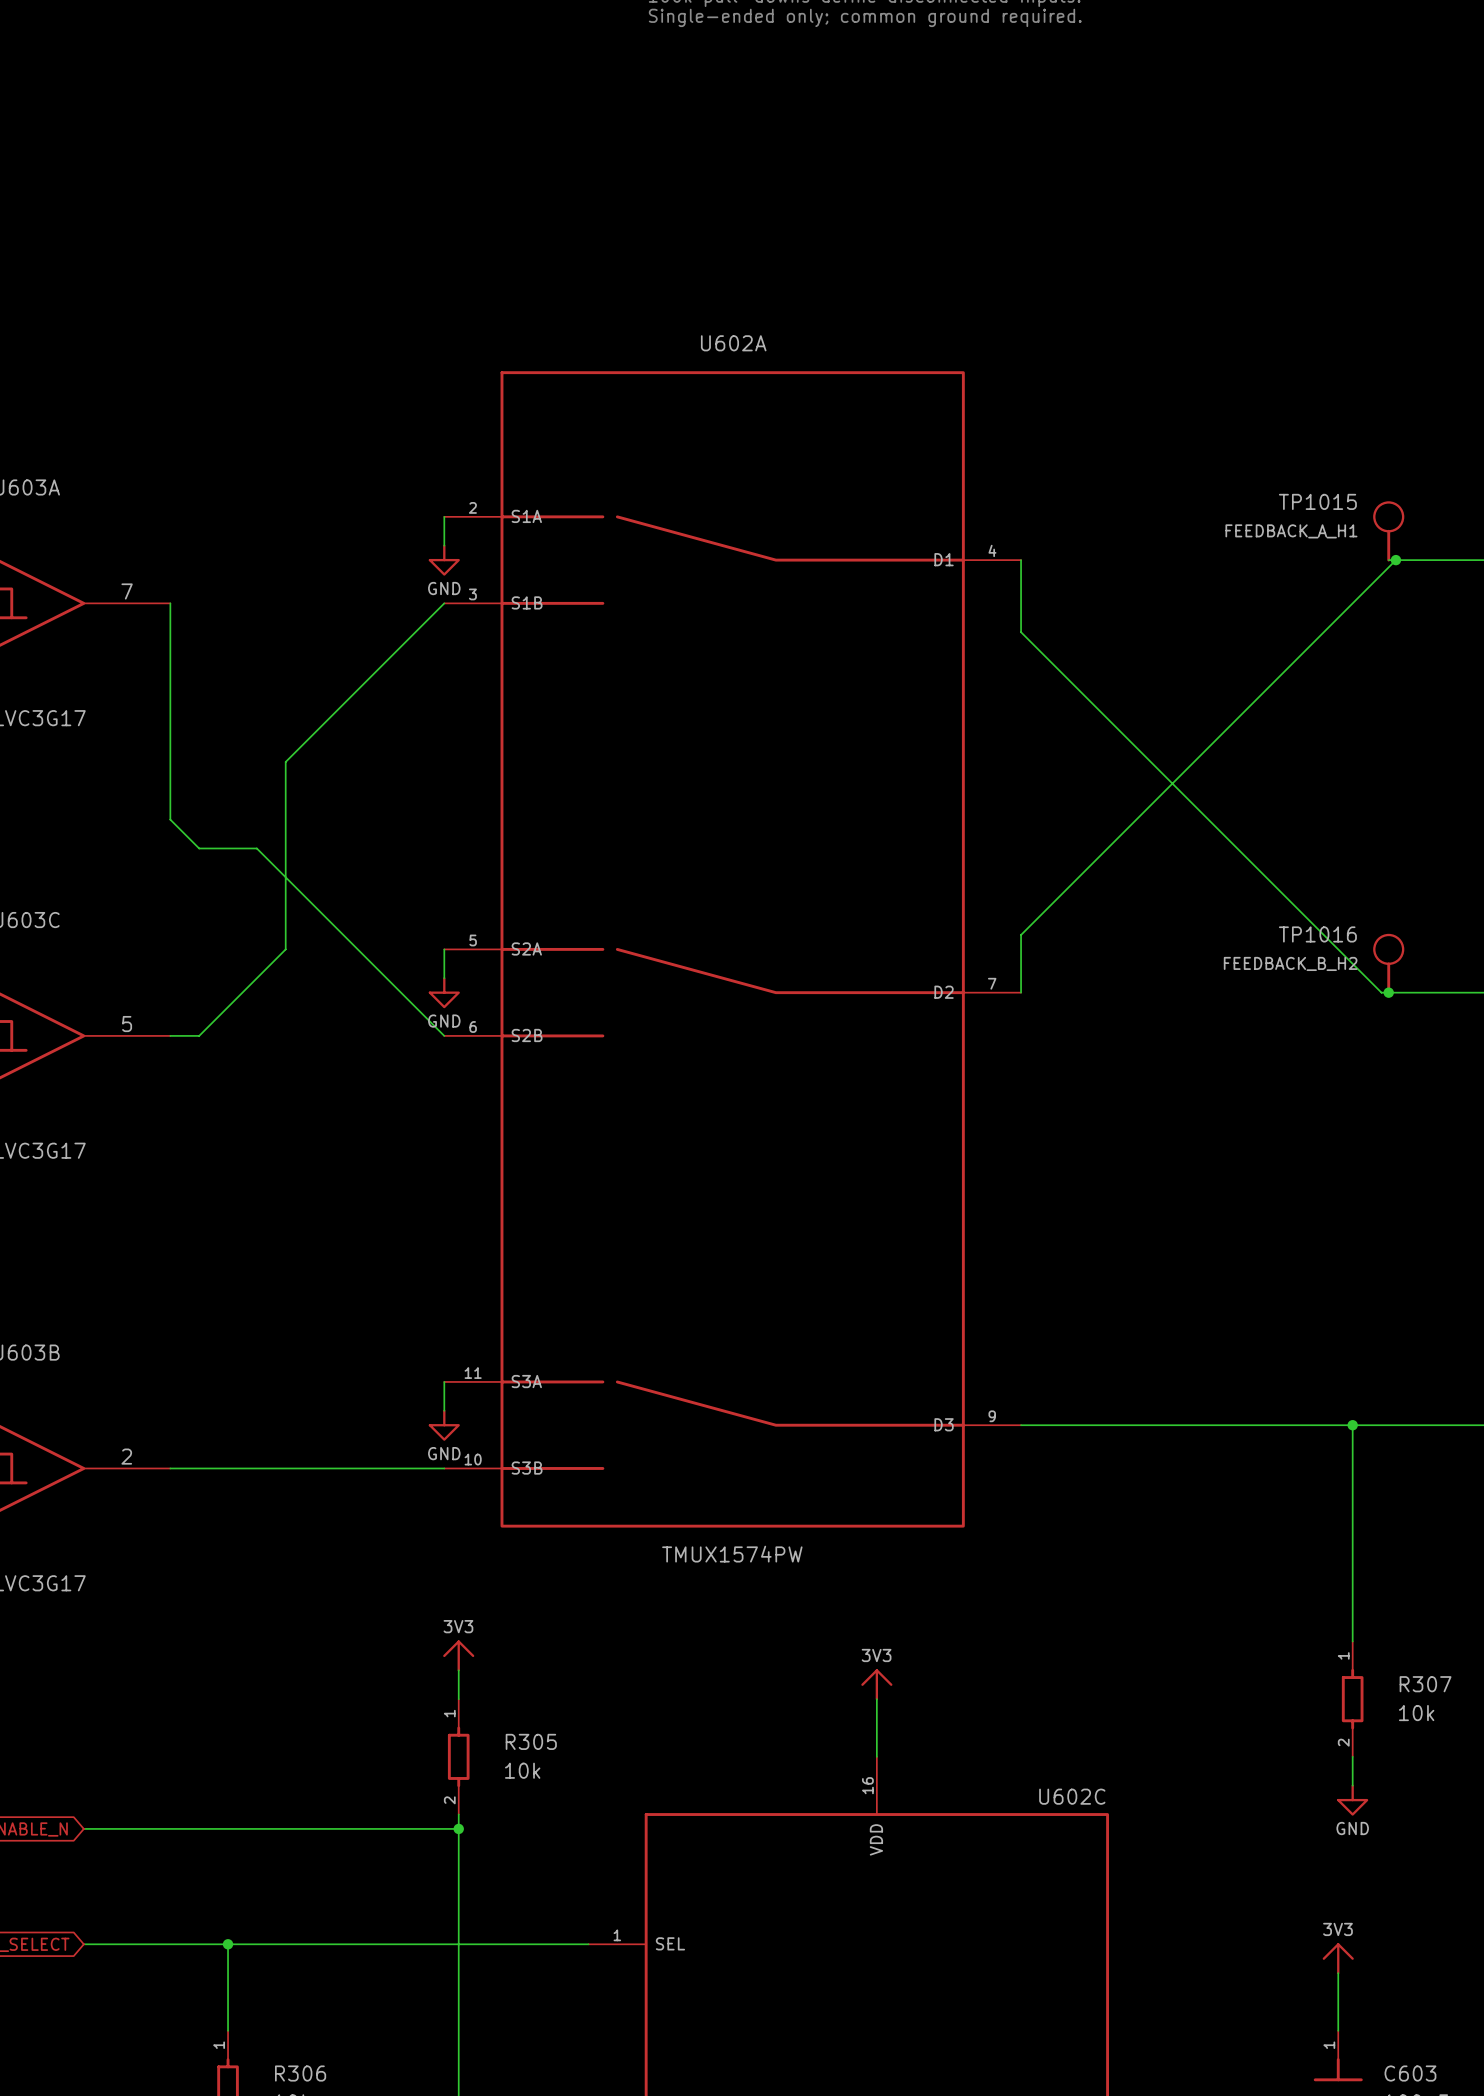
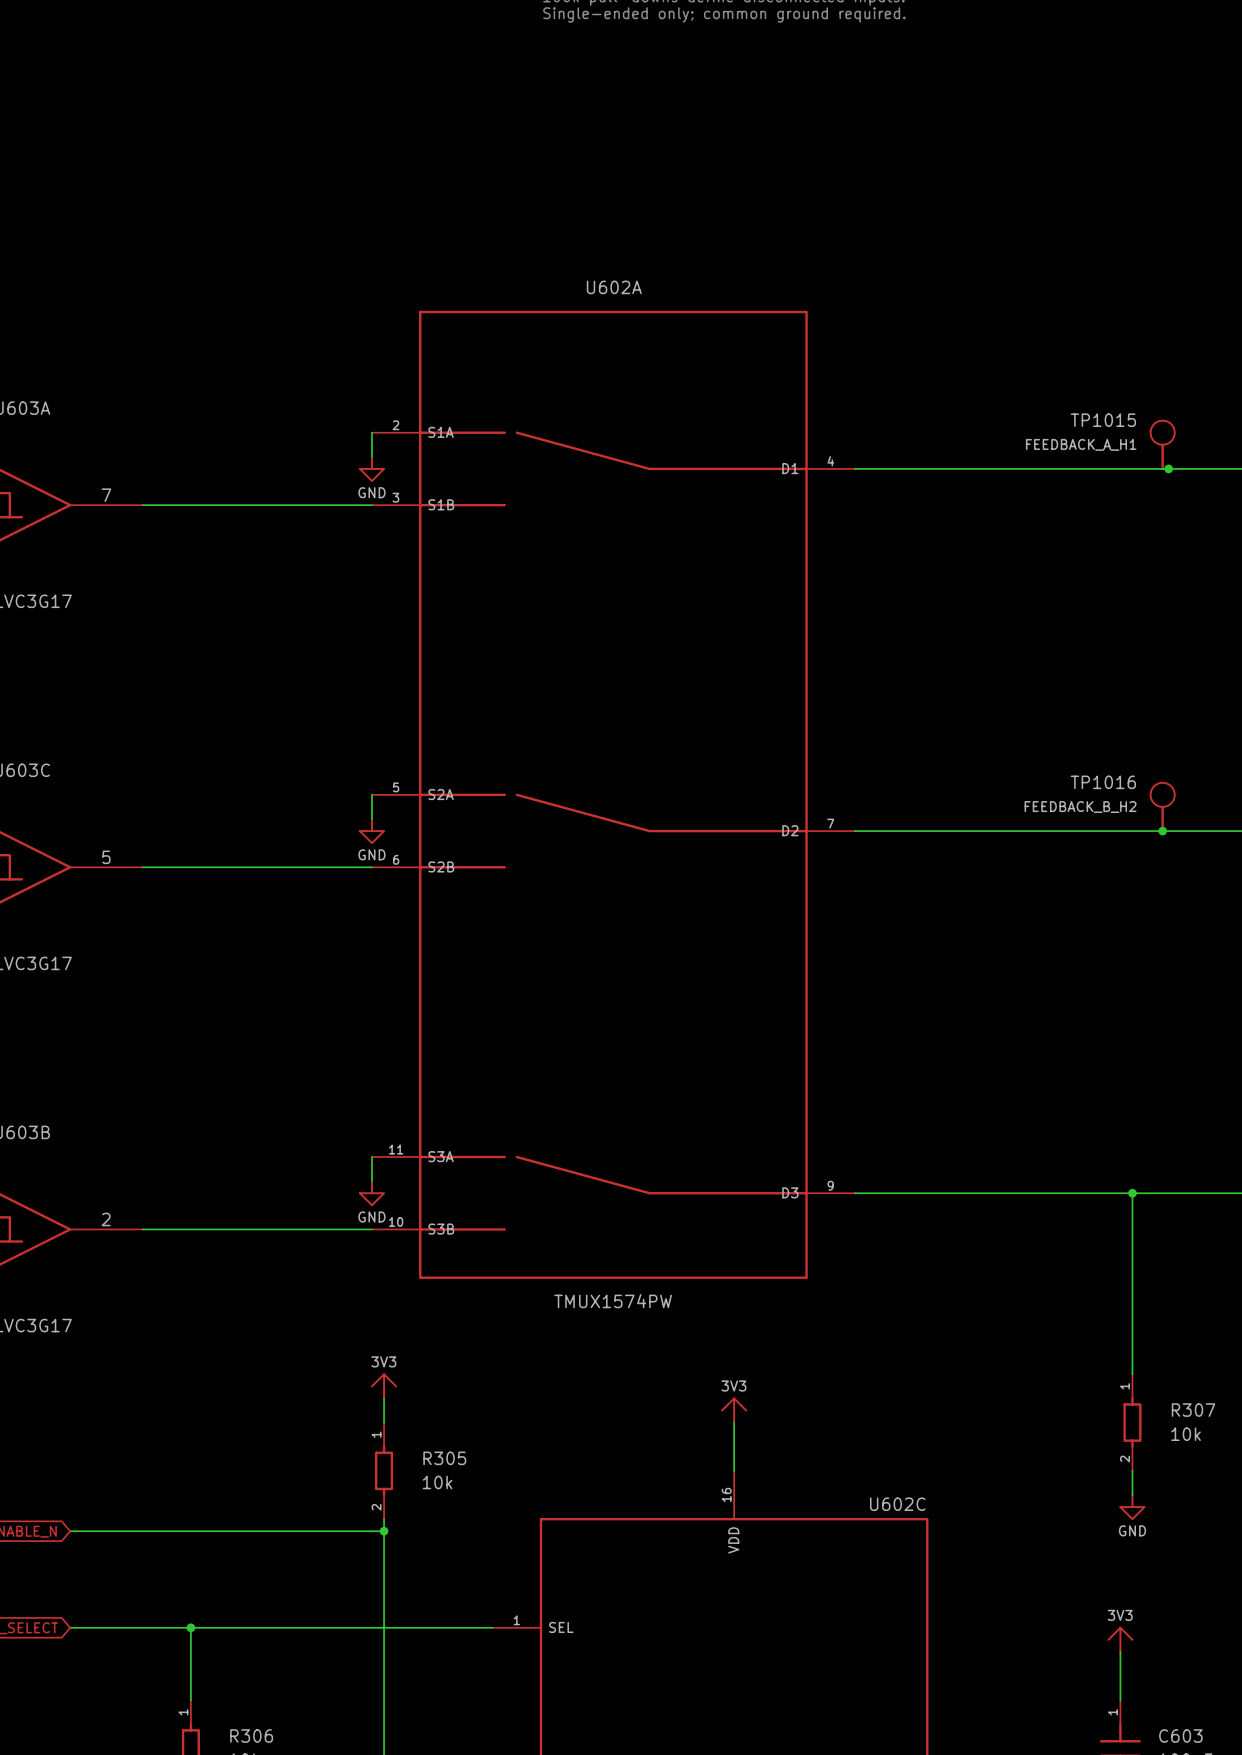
wire: (1021, 560) (1021, 632) (1381, 992) -> (854, 831) (1156, 831)
wire: none -> (854, 468) (1162, 468)
wire: (1395, 560) (1021, 934) (1021, 992) -> none
wire: (170, 603) (170, 819) (199, 848) (256, 848) (444, 1035) -> (142, 505) (371, 505)
wire: (444, 603) (285, 761) (285, 949) (199, 1035) -> (371, 867) (166, 867)

